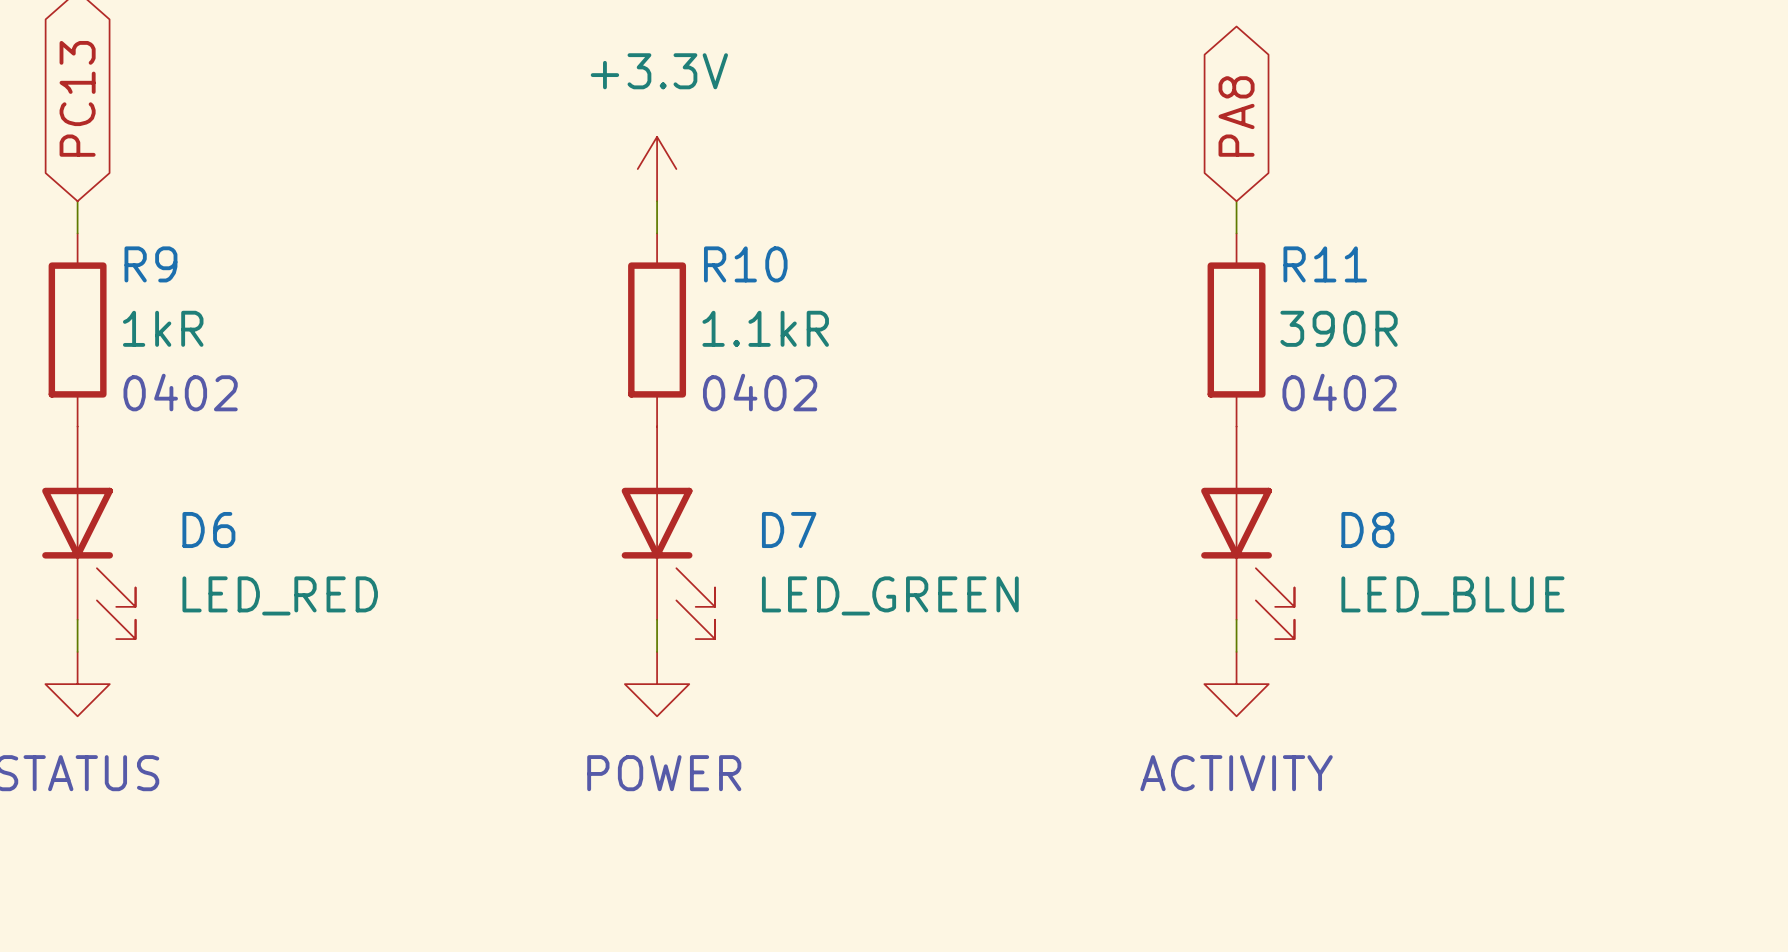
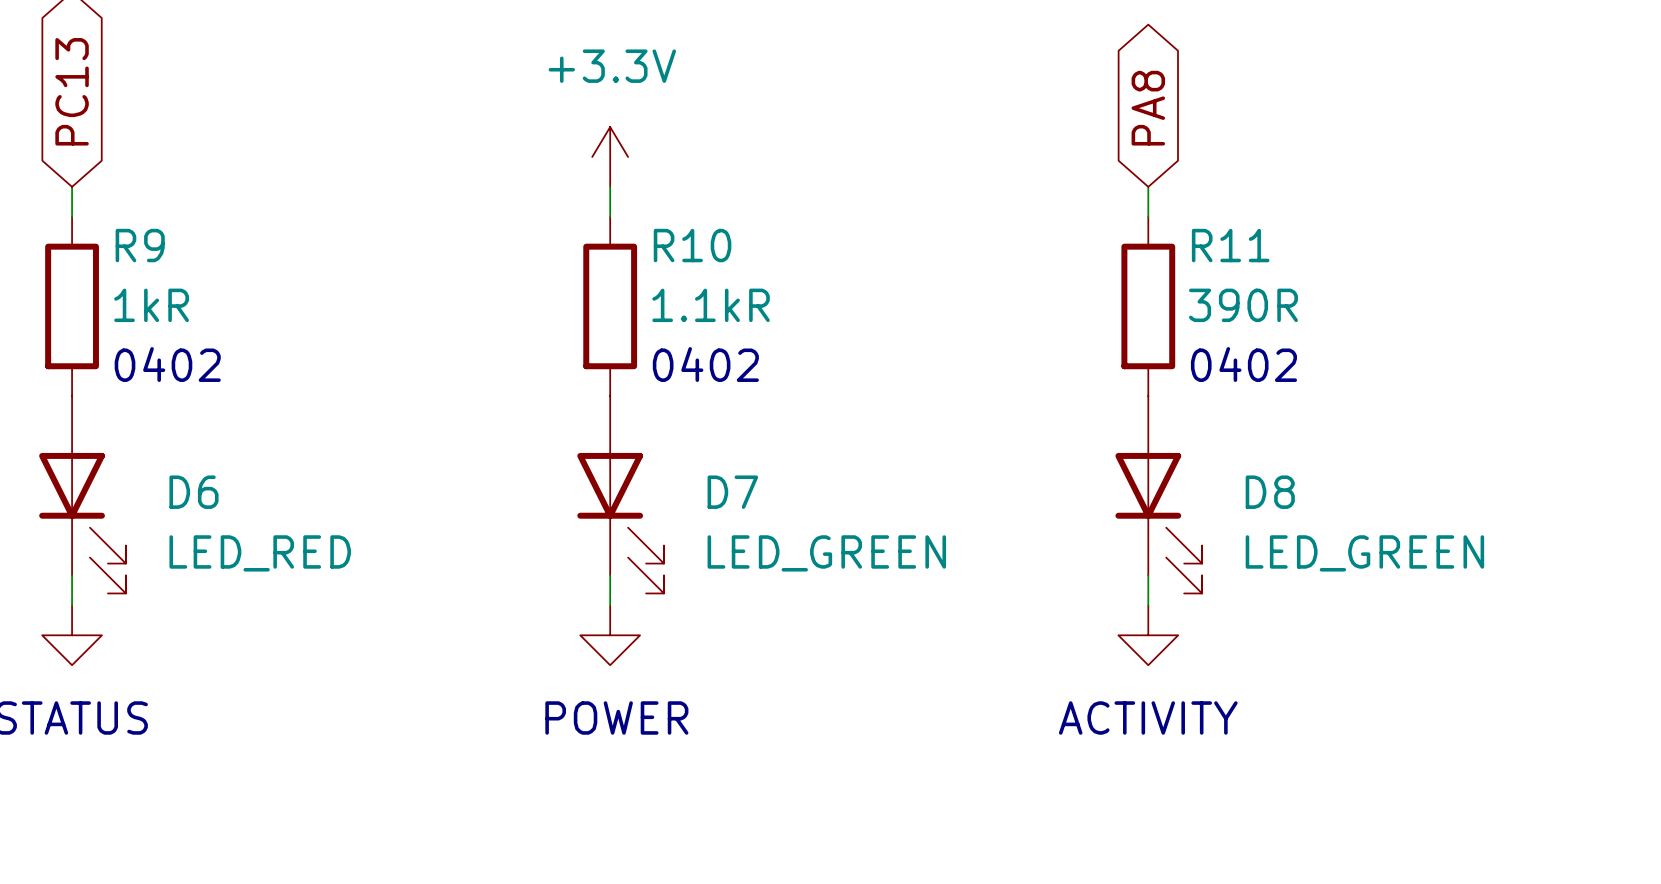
D8 value: LED_BLUE (1452, 595) -> LED_GREEN (1364, 553)

